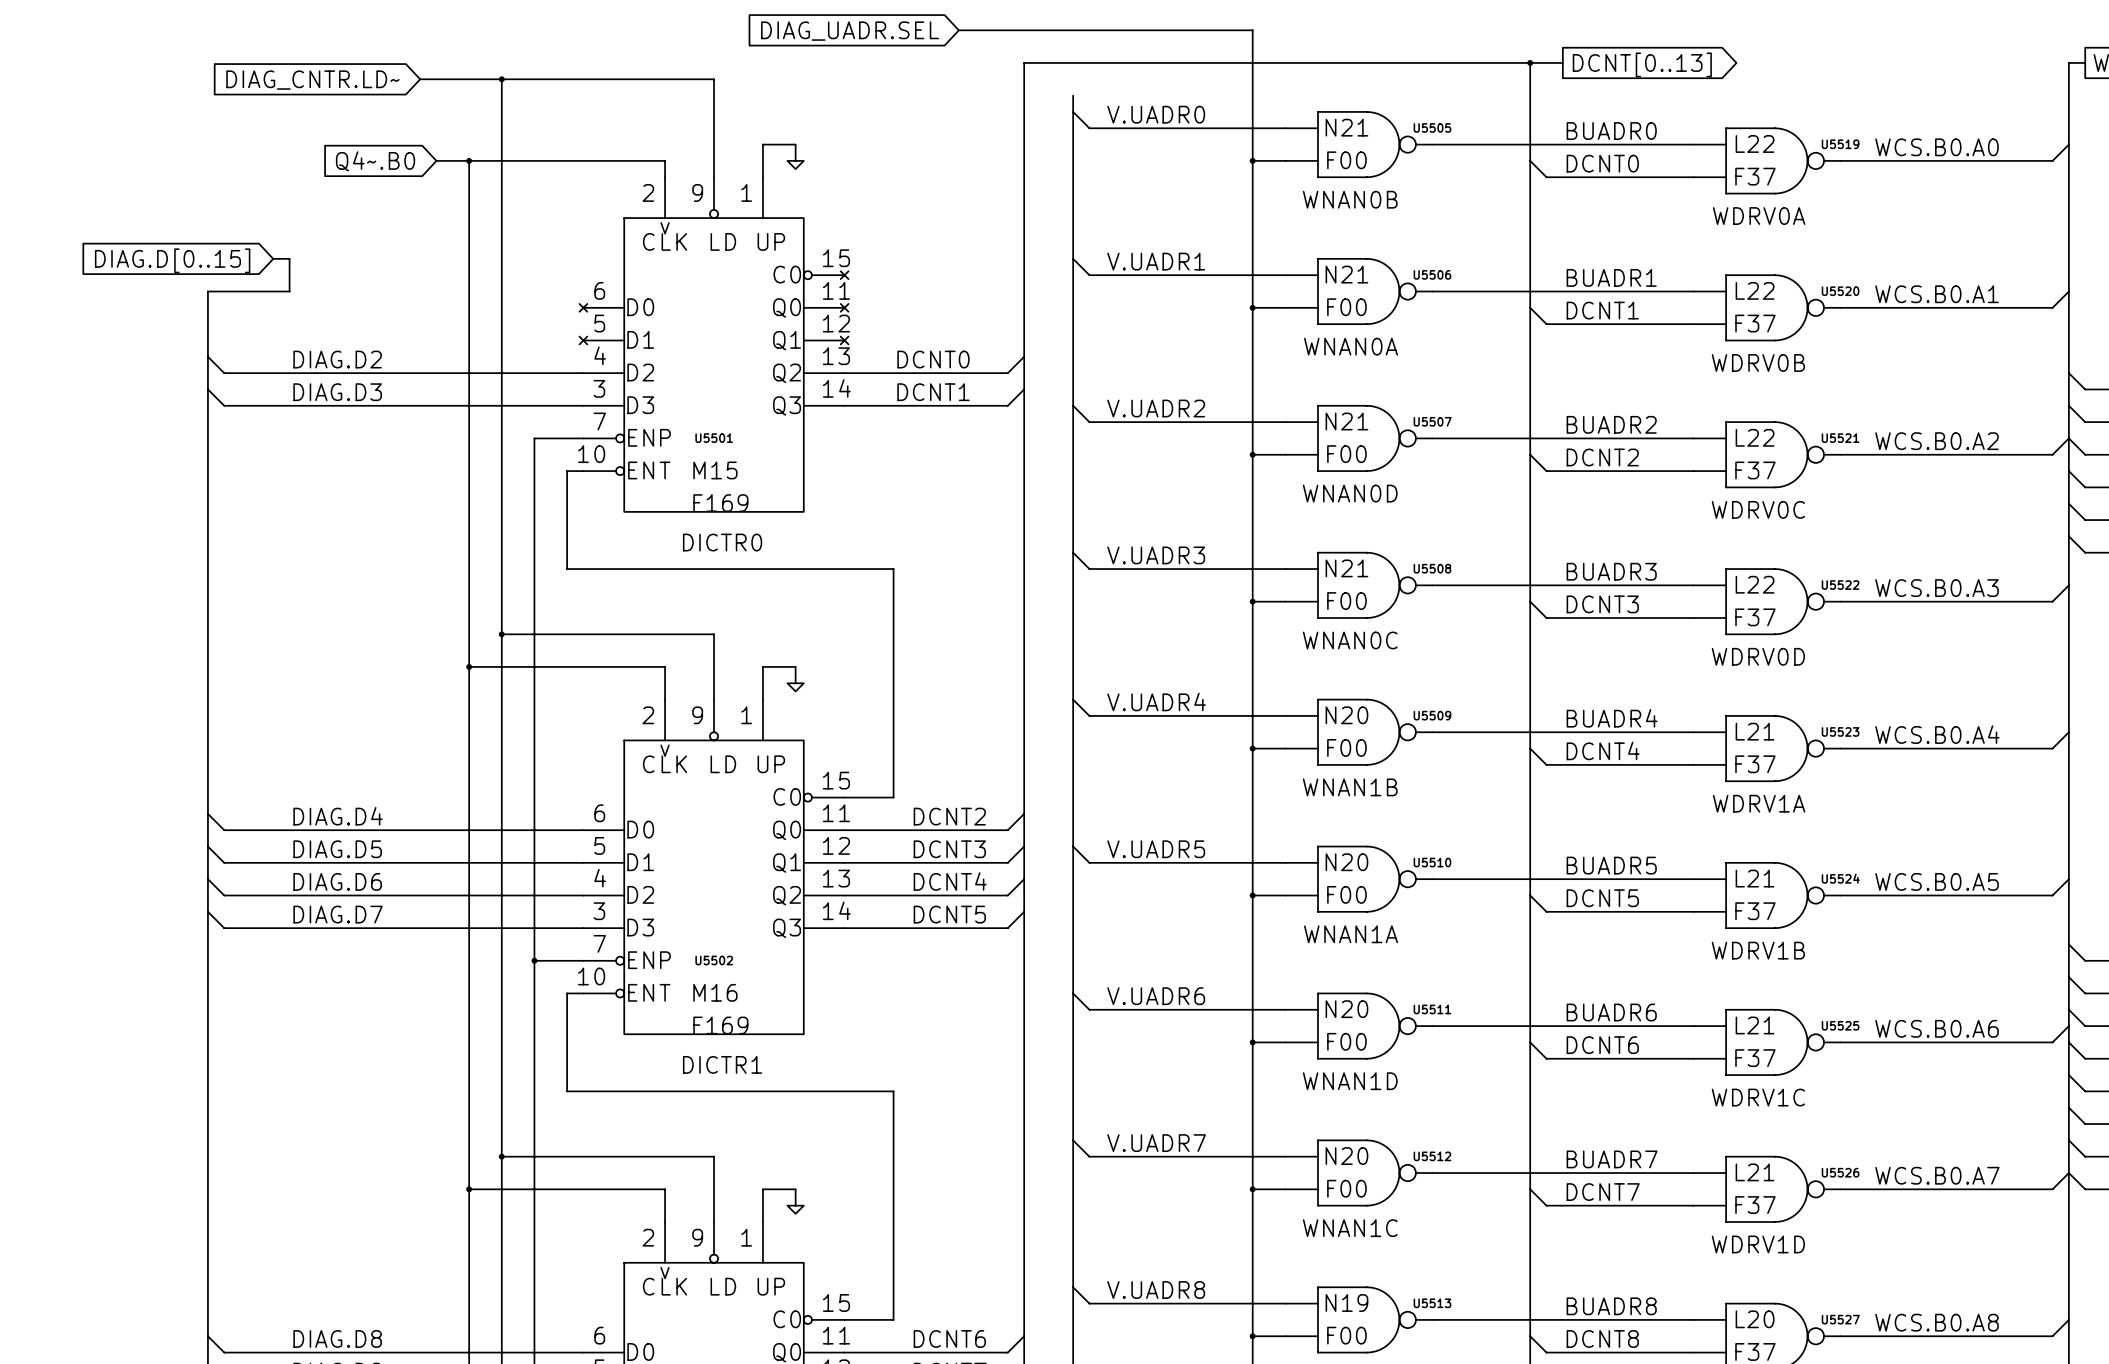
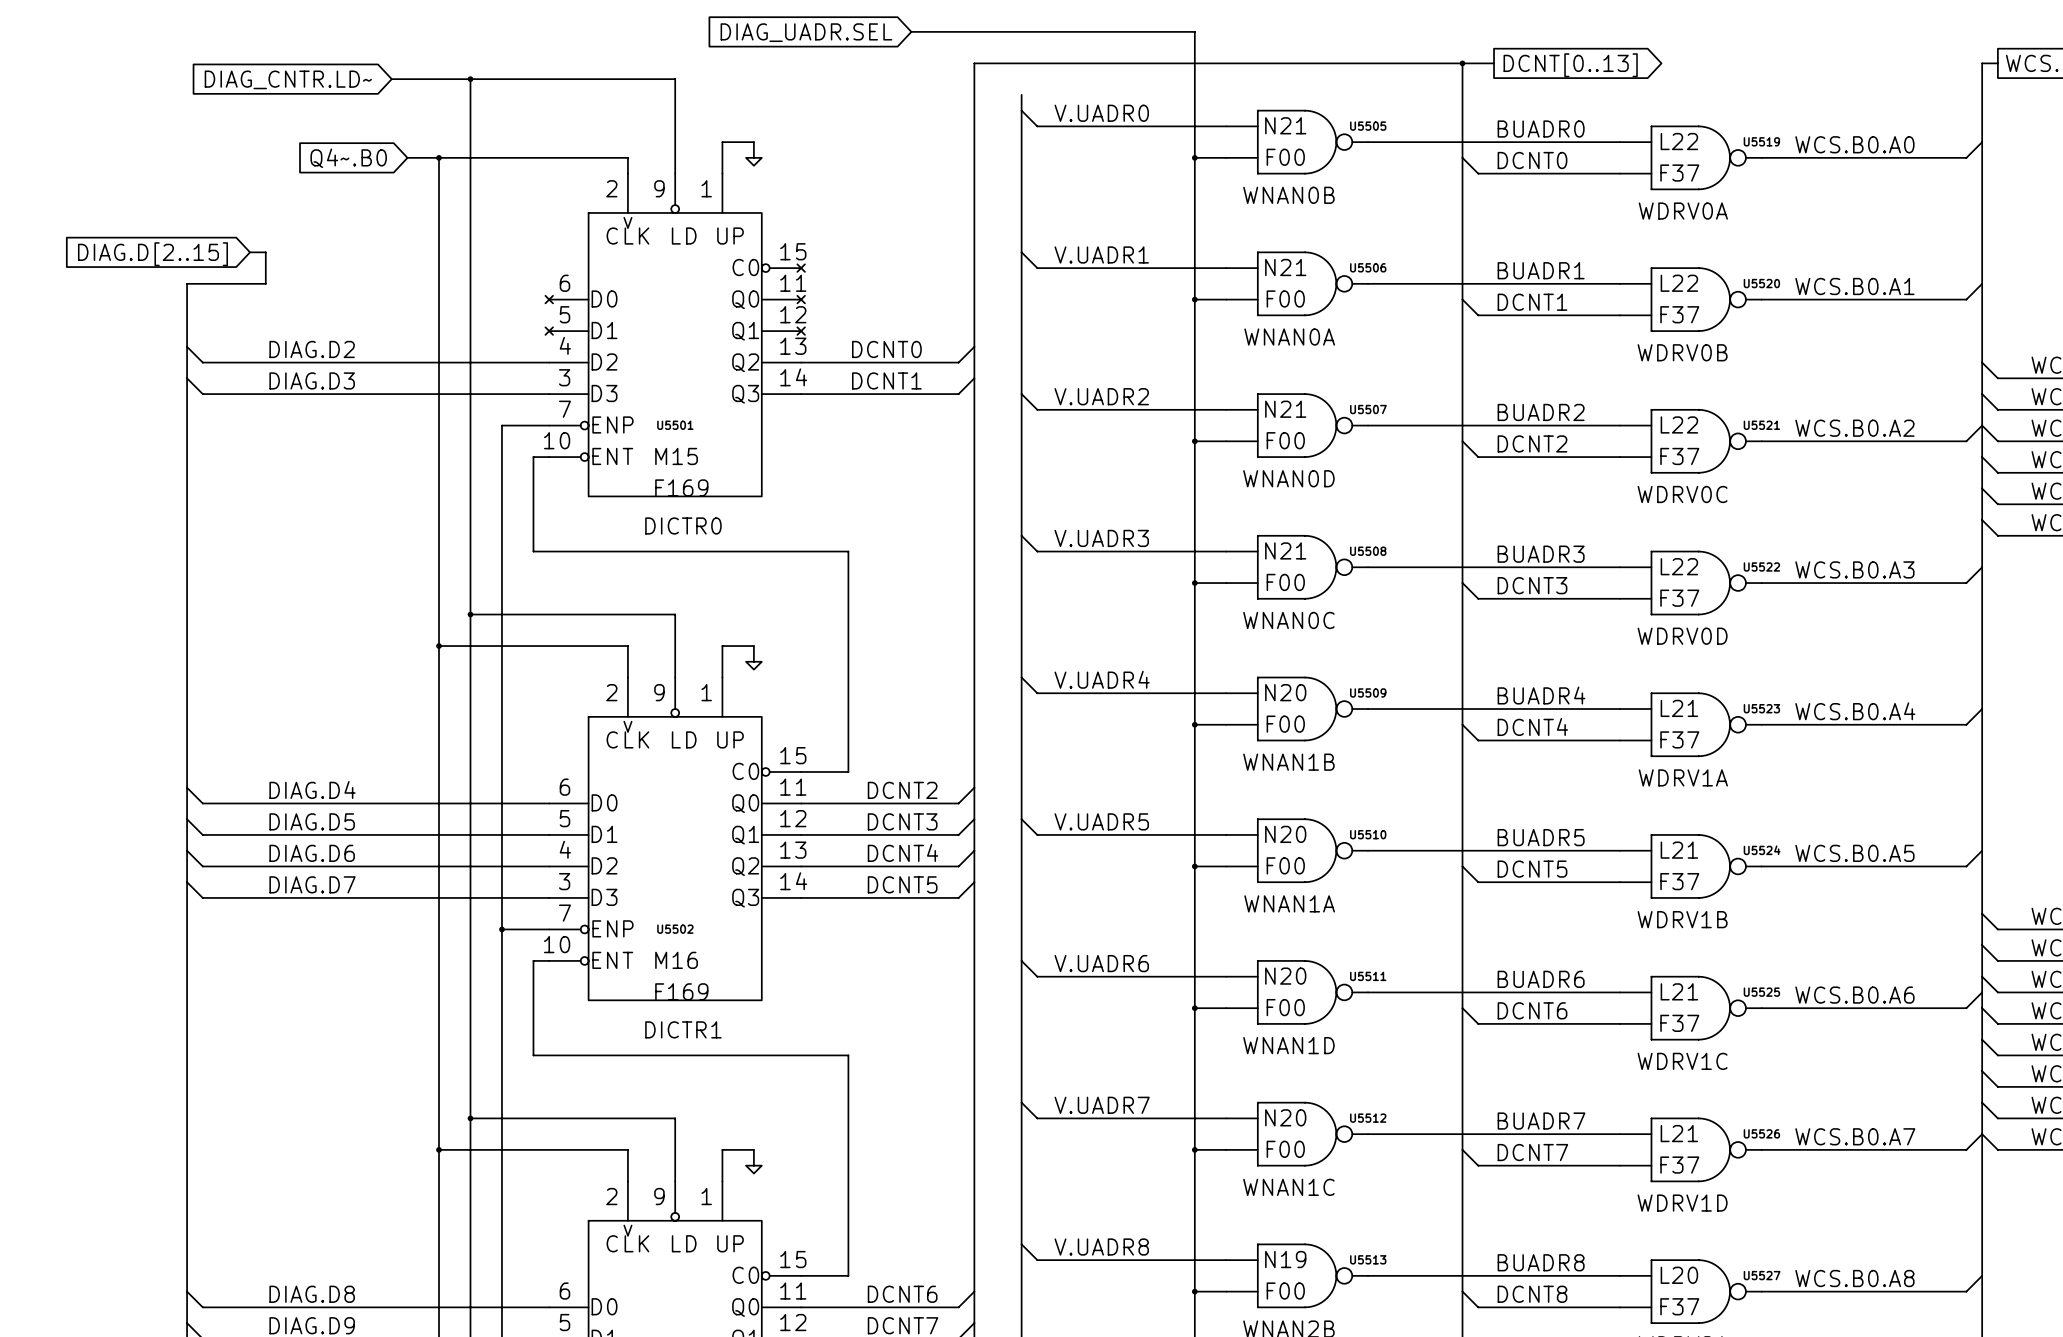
global label: DIAG.D[0..15] (172, 260) -> DIAG.D[2..15] (152, 254)

